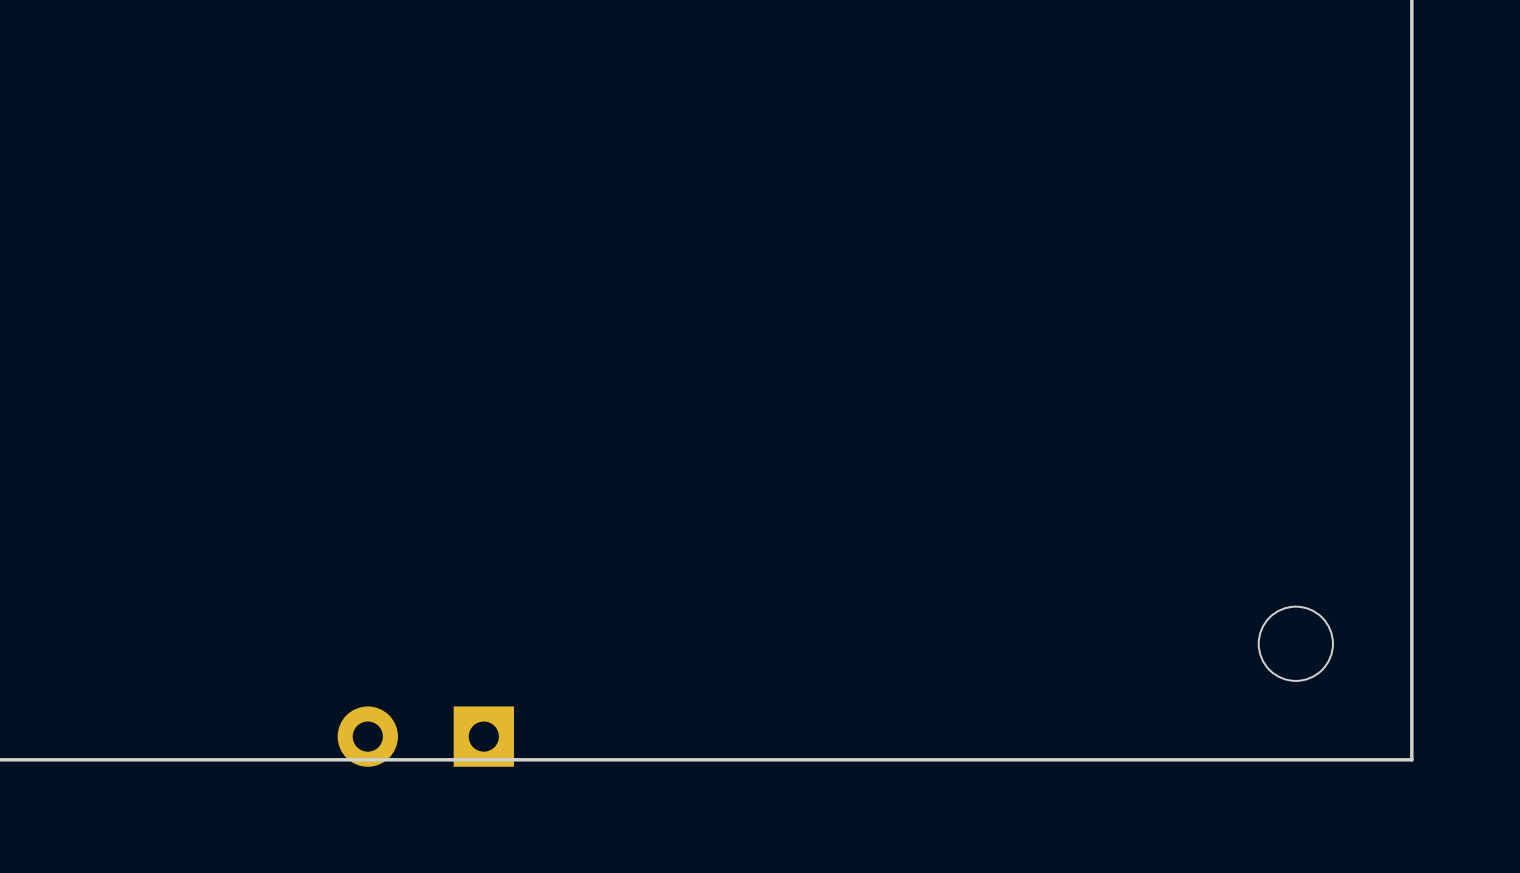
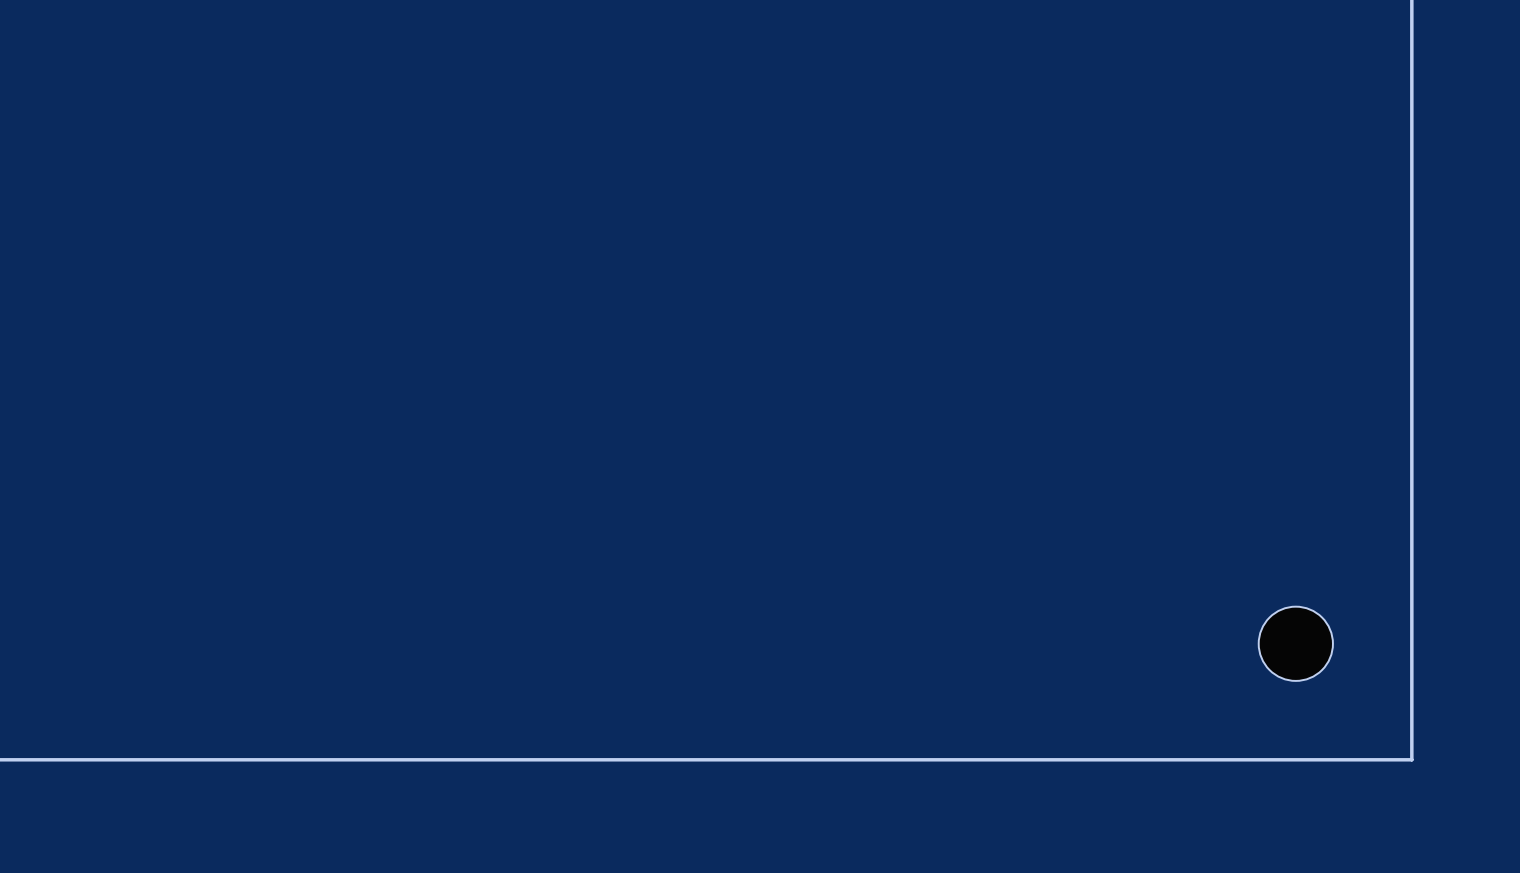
part: (425, 736) -> none

